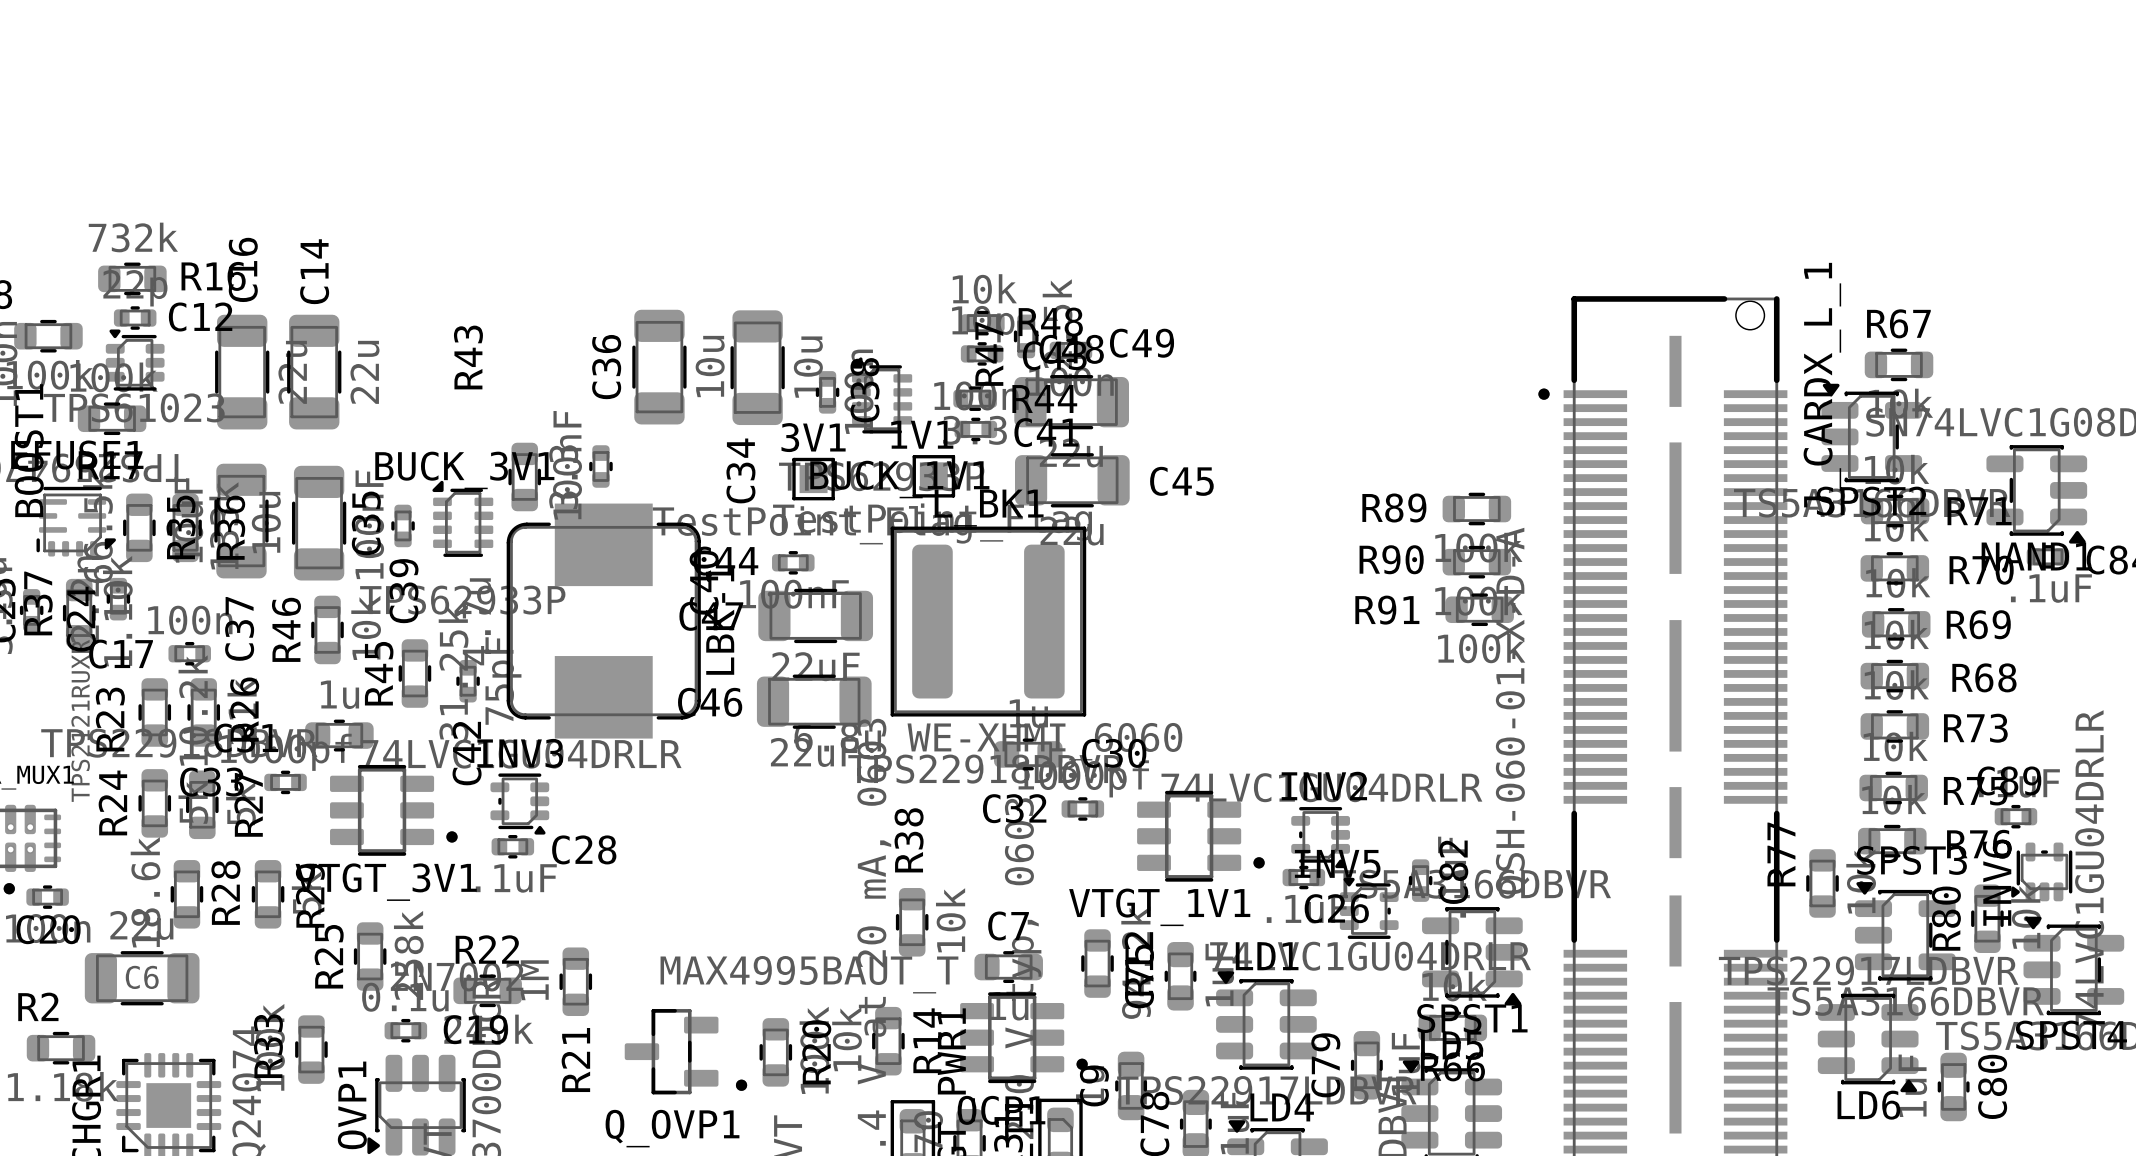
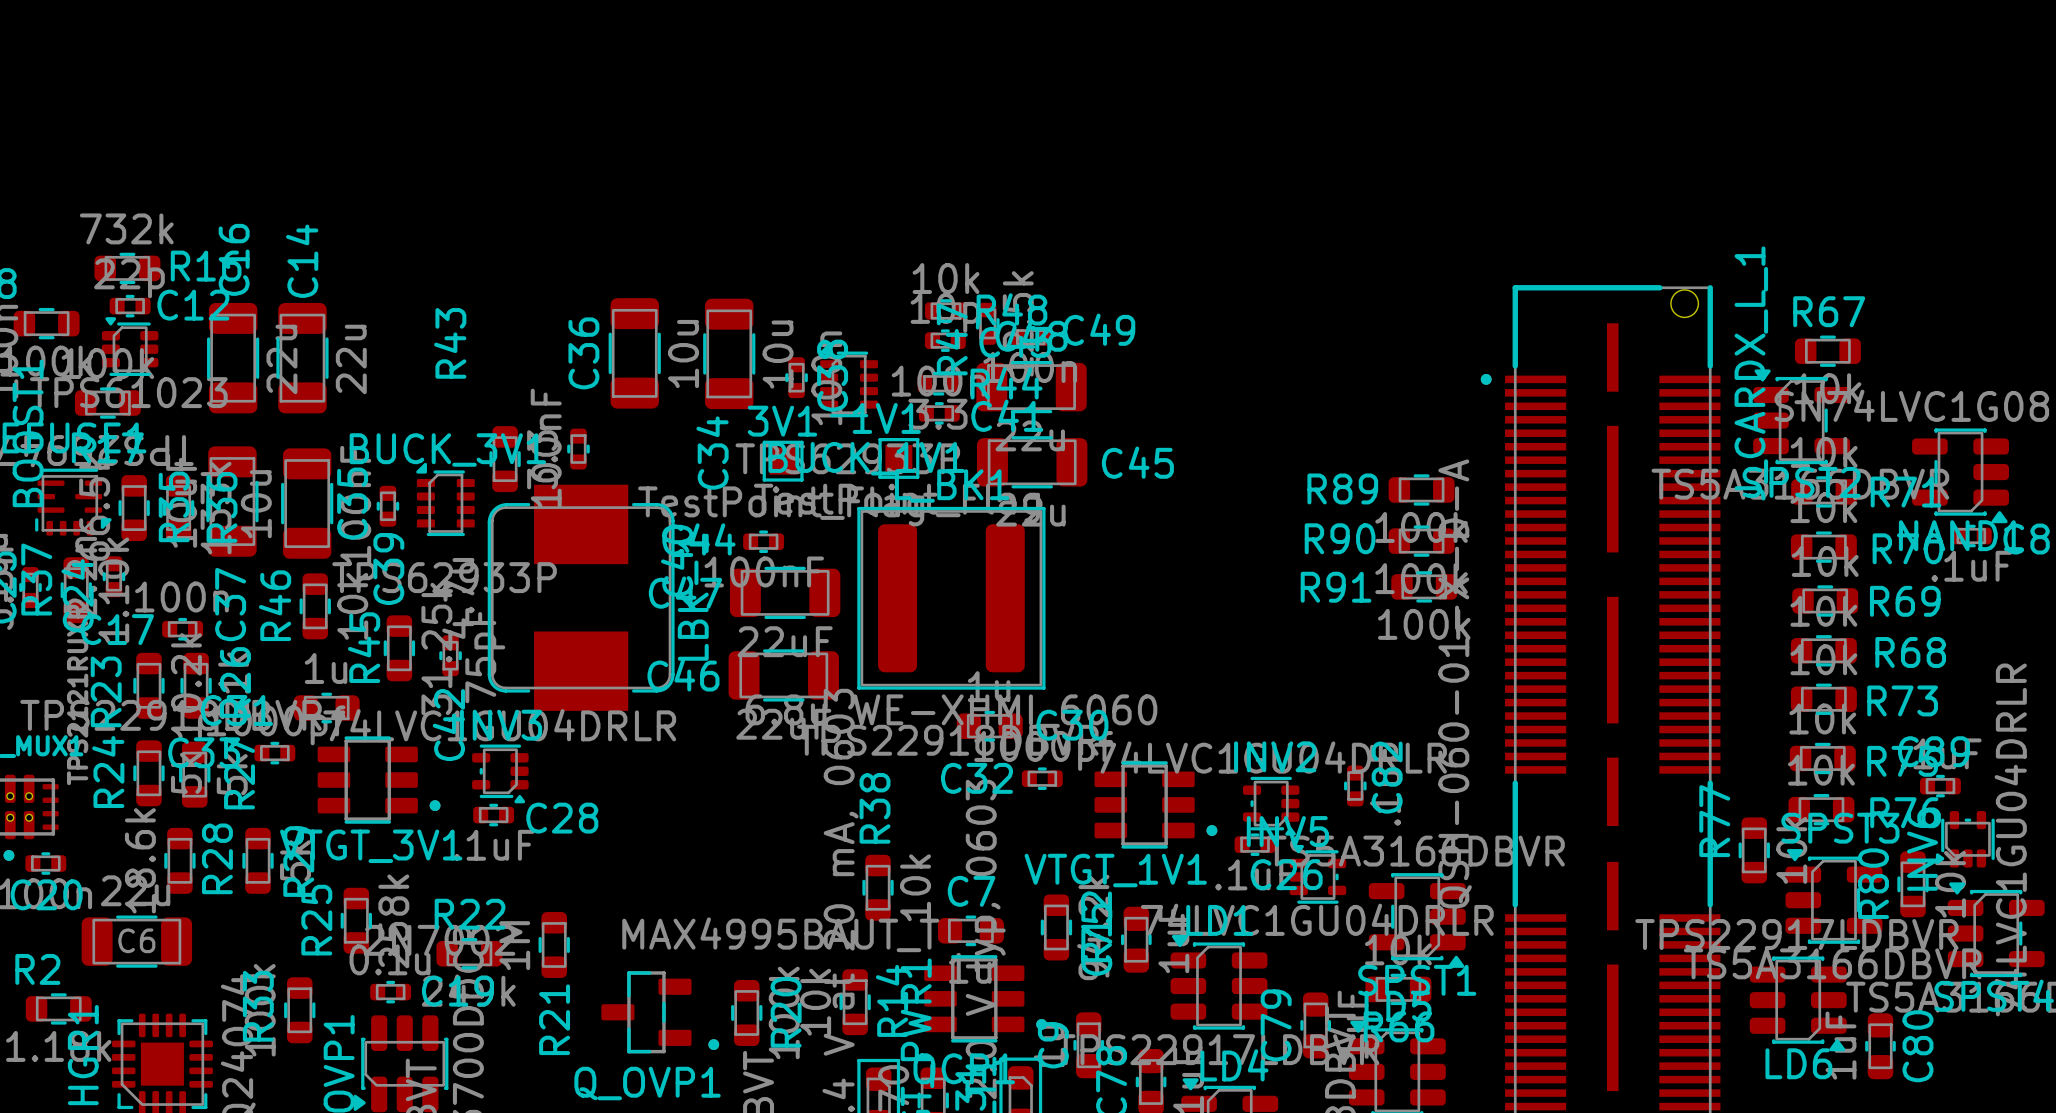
C82 position: (1420, 880) -> (1355, 785)

